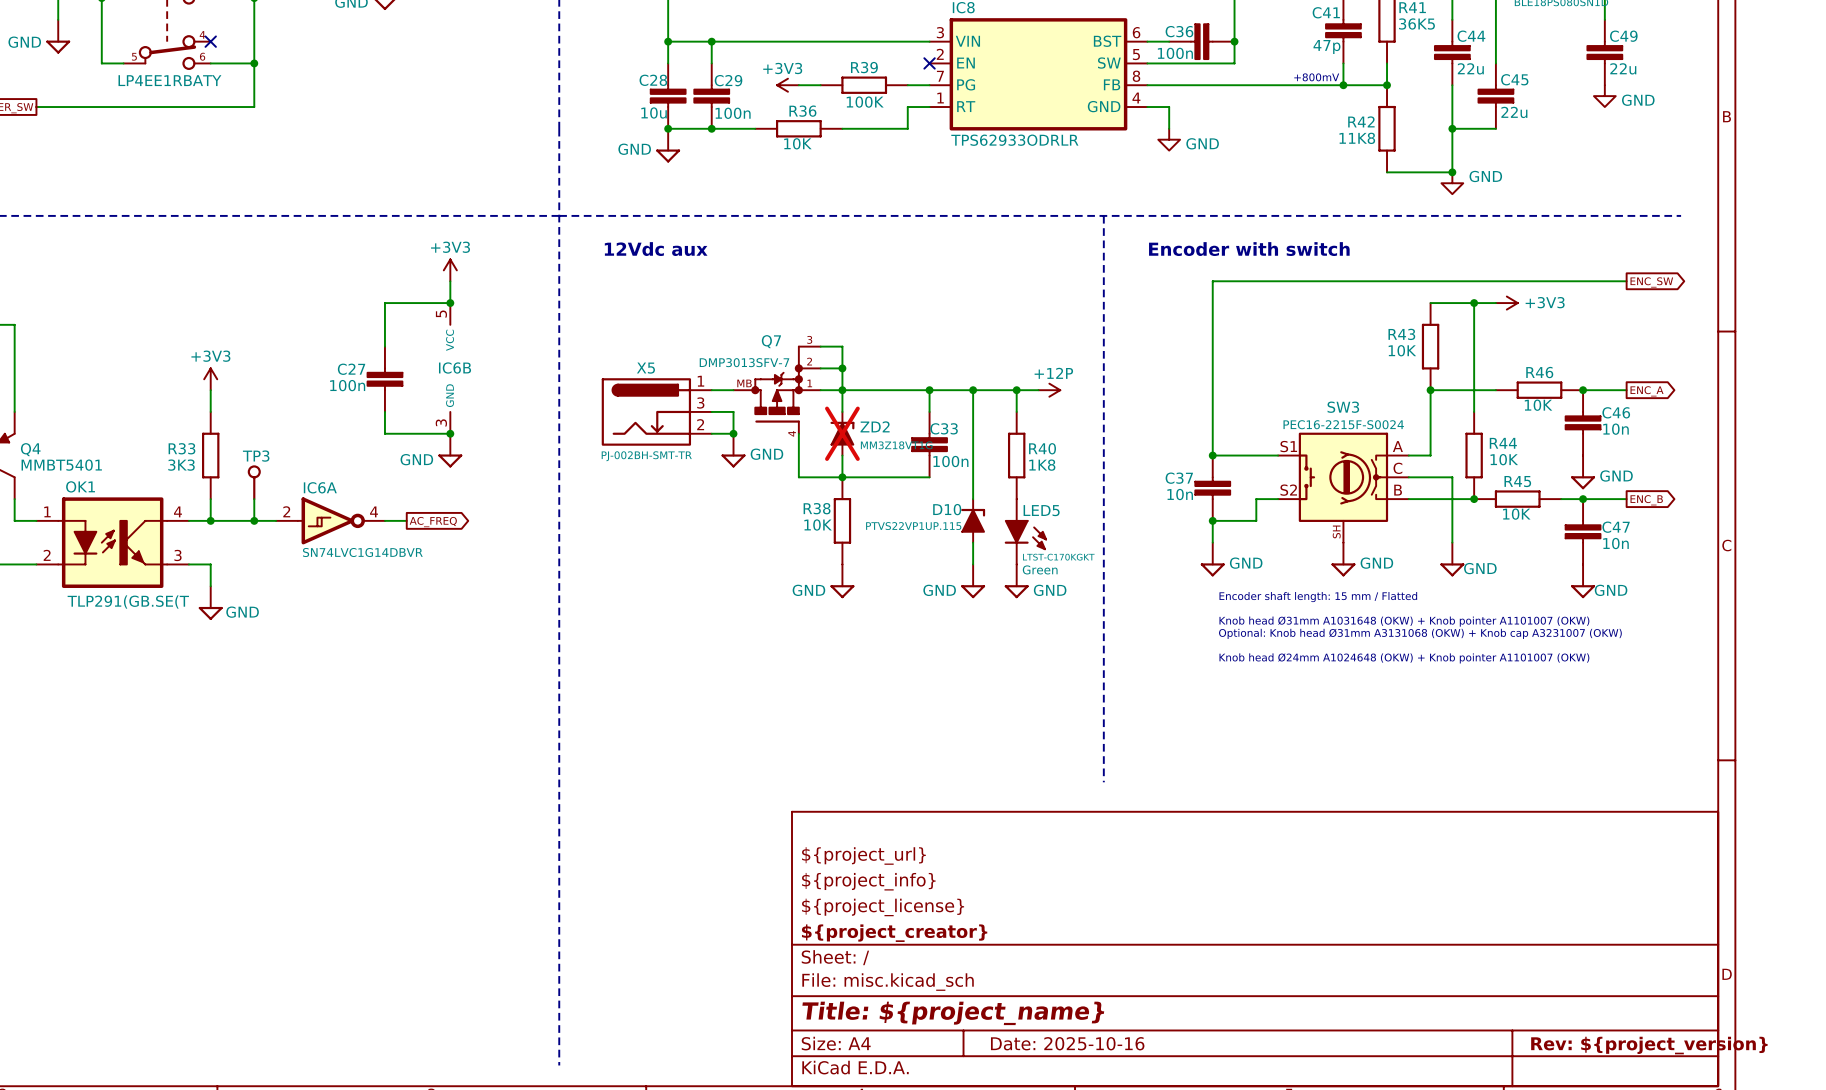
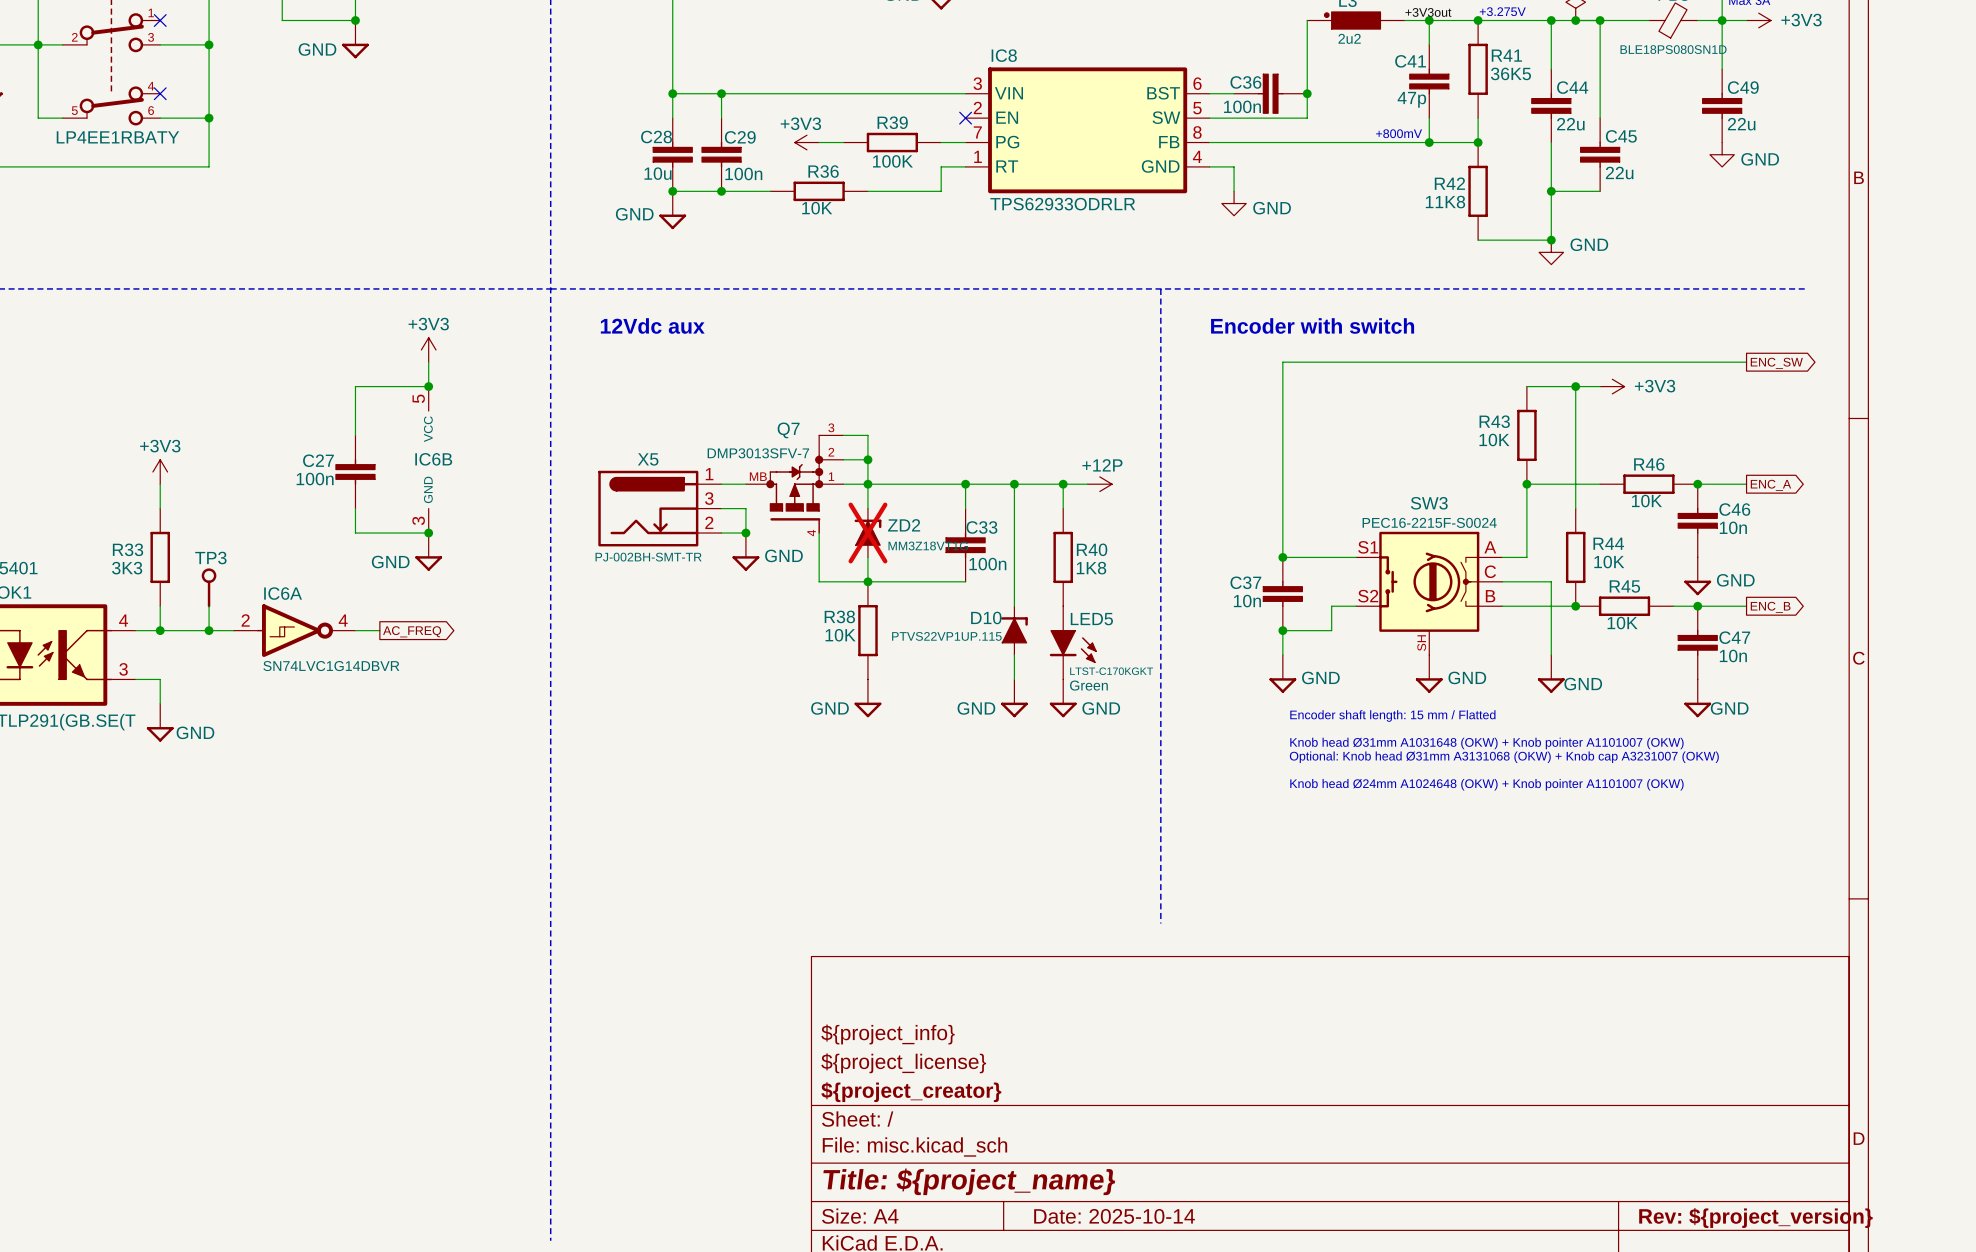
title block: ${project_url} (863, 856) -> none
title block: Date: 2025-10-16 (1067, 1043) -> Date: 2025-10-14 (1114, 1216)

